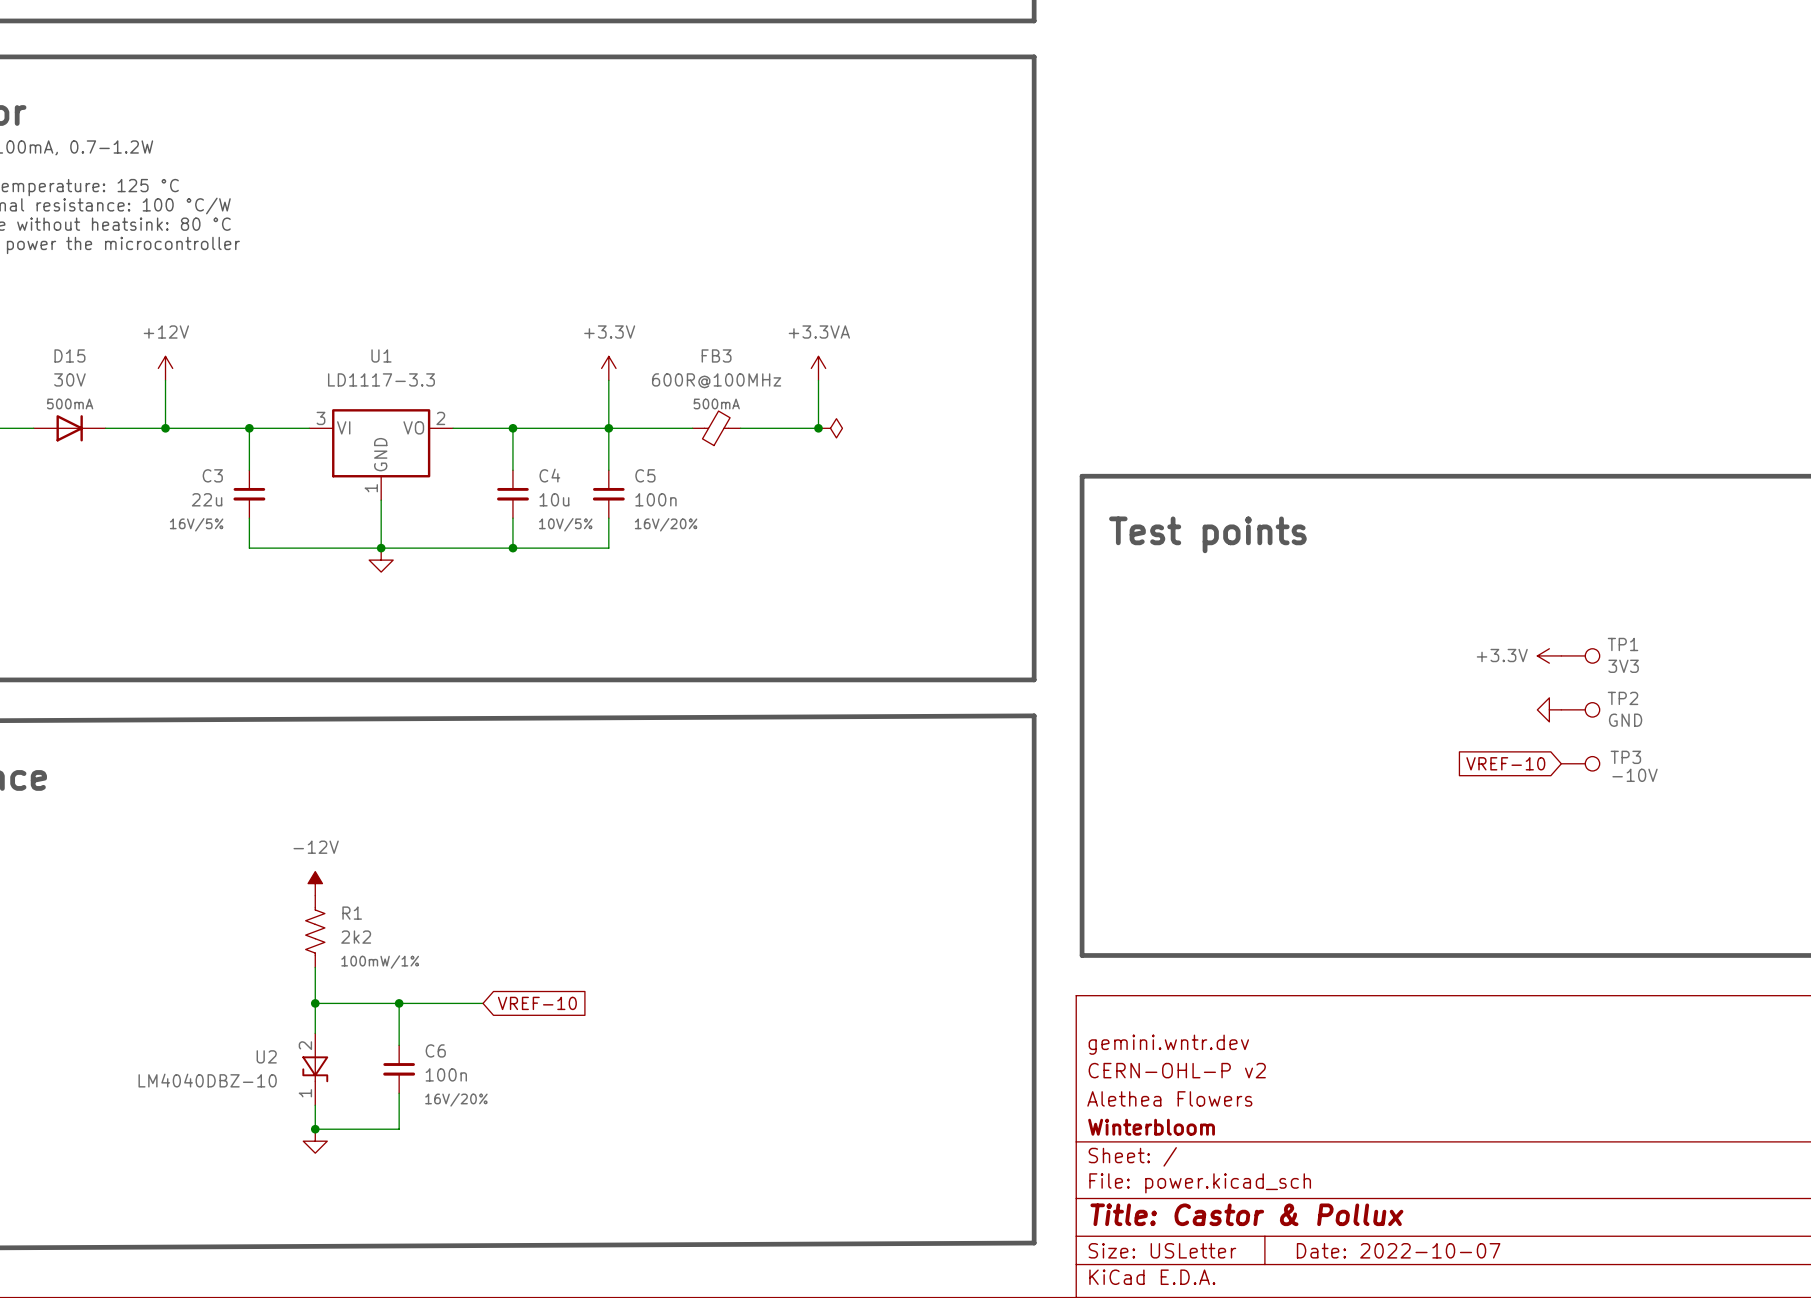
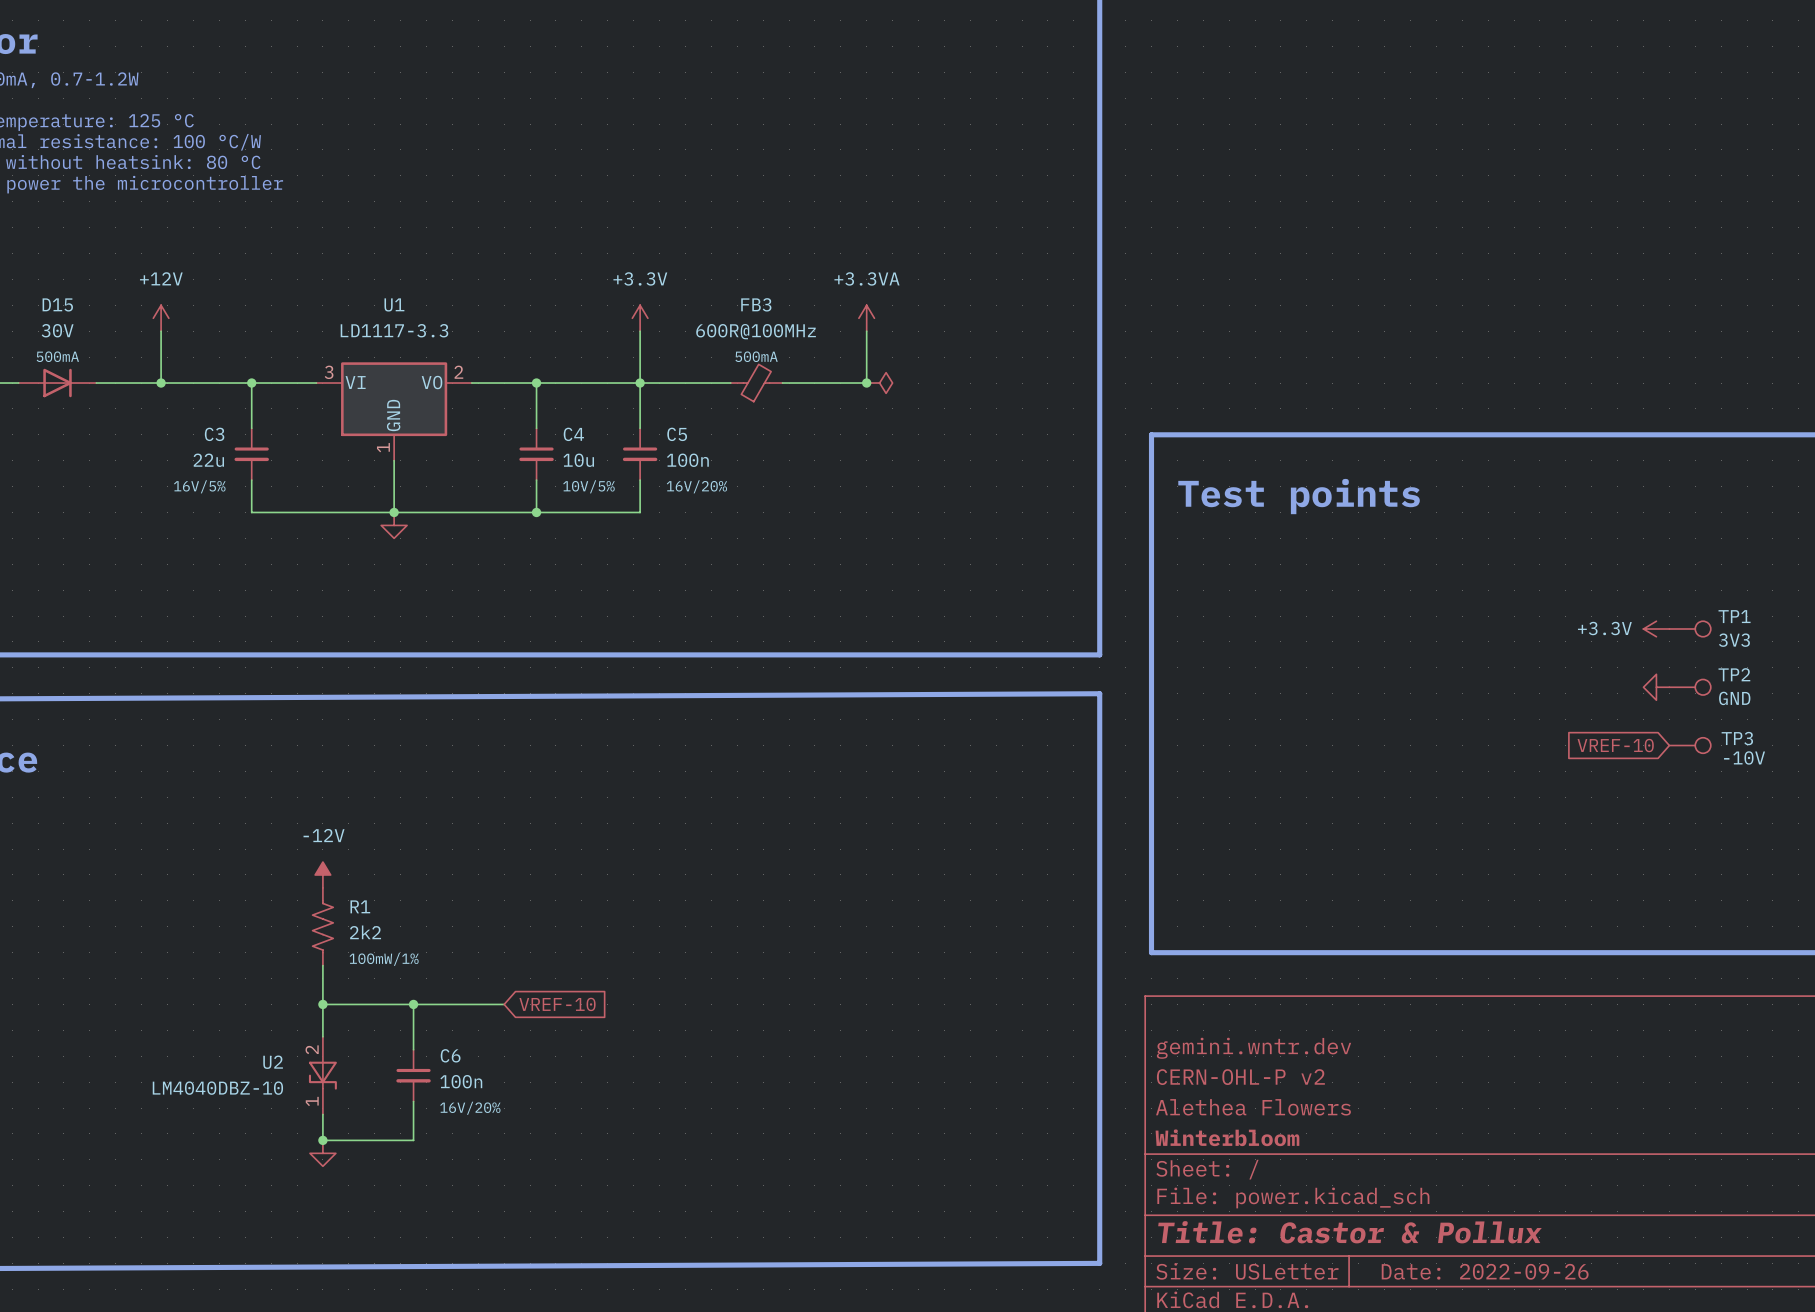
title block: Date: 2022-10-07 (1398, 1250) -> Date: 2022-09-26 (1485, 1271)

